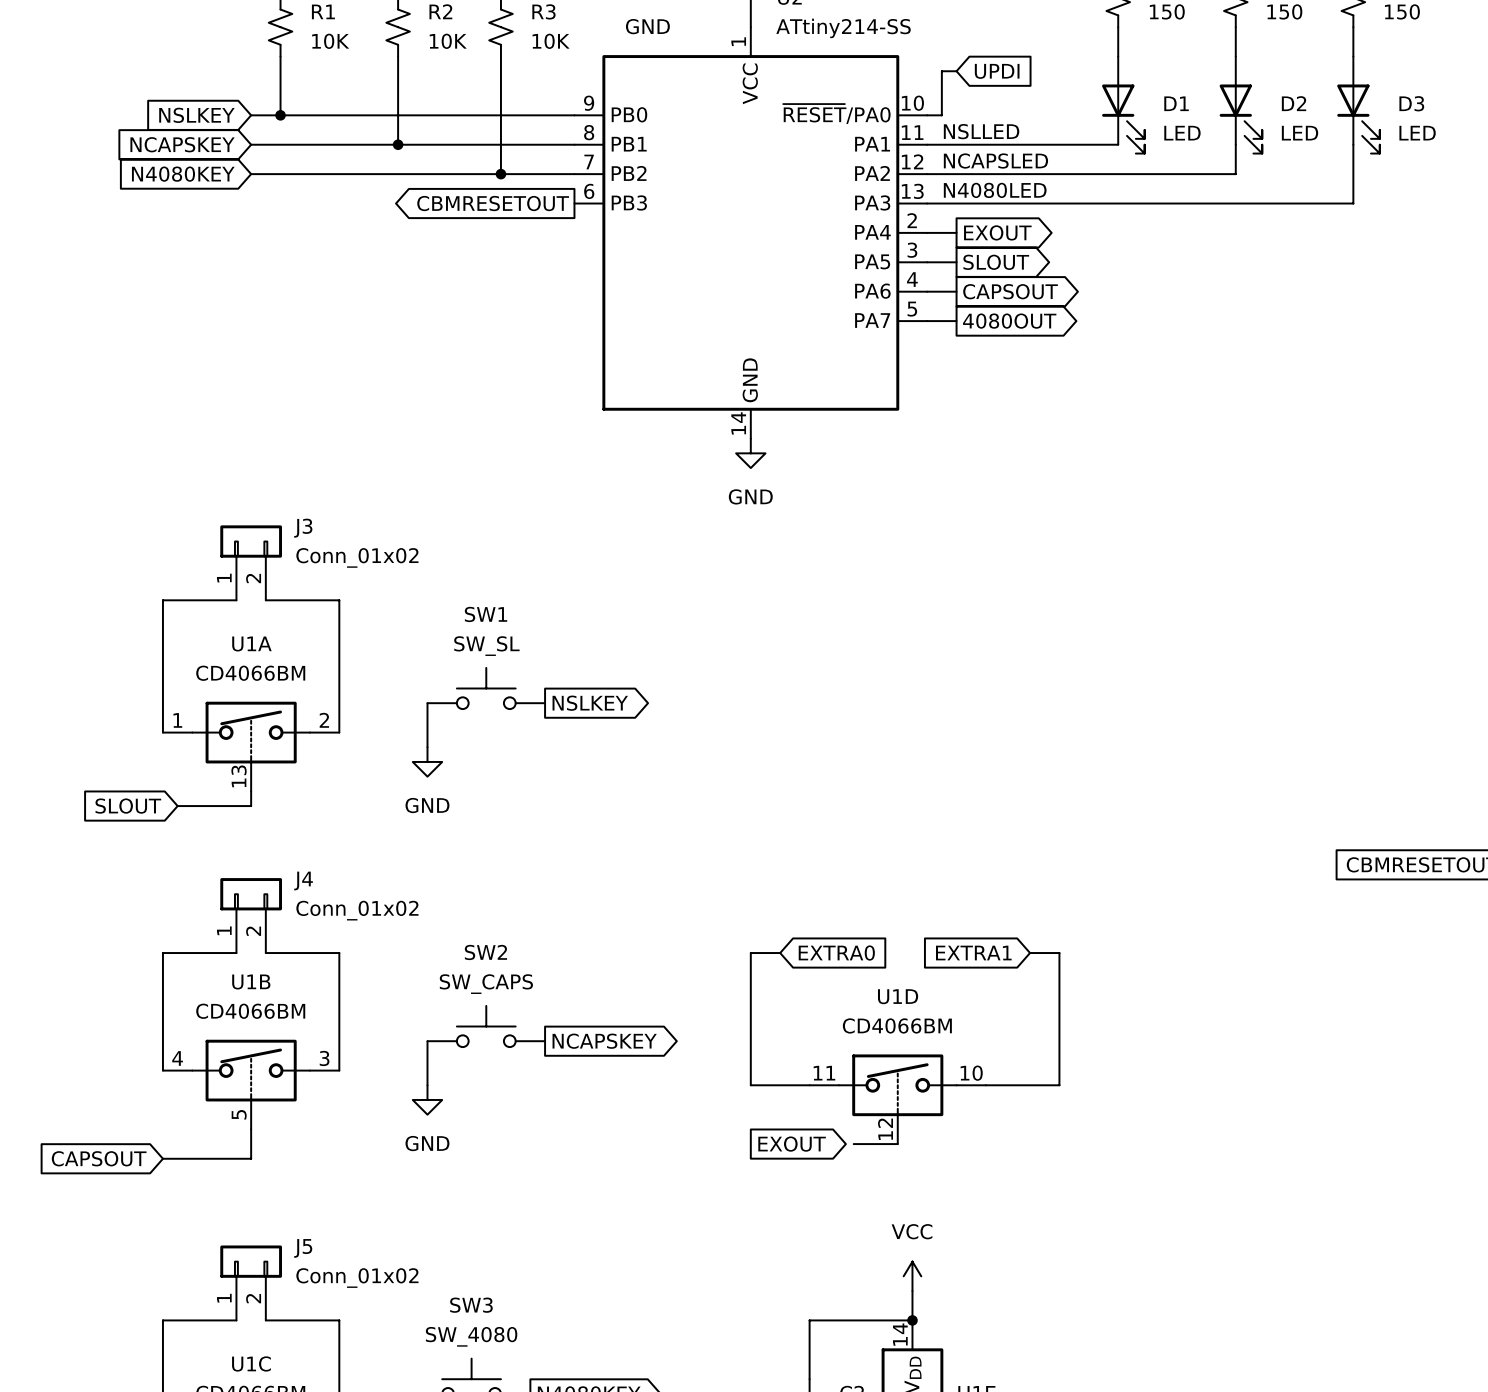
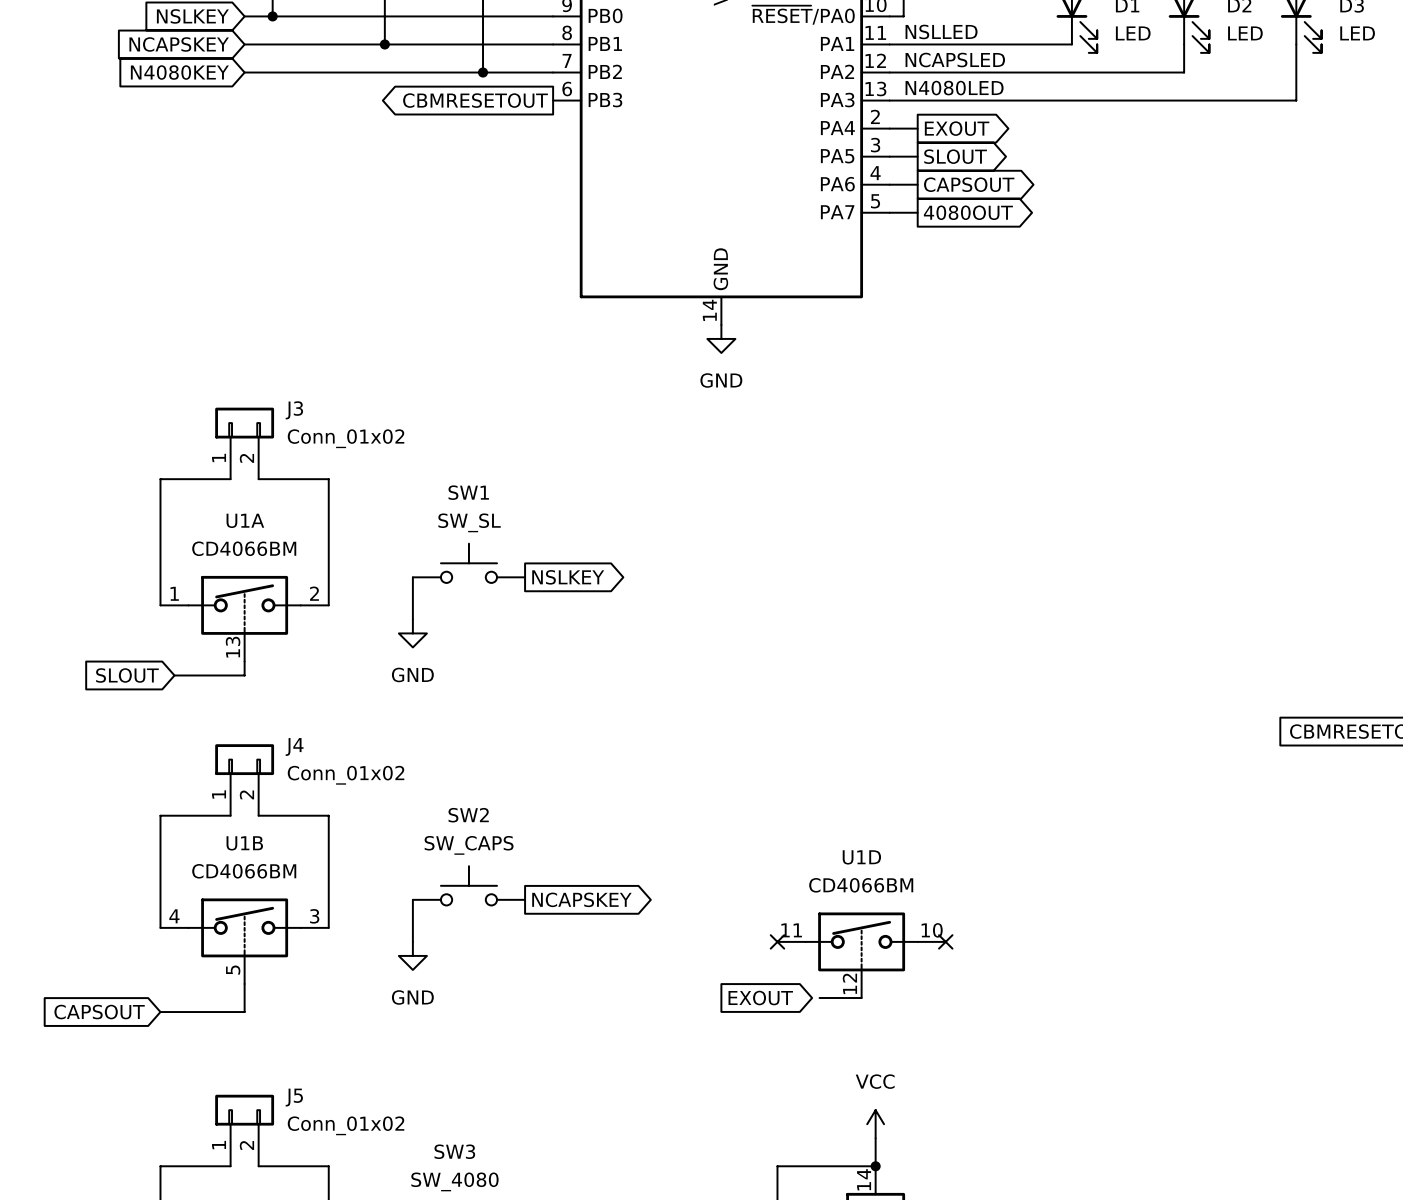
wire: (780, 953) (750, 953) (750, 1085) (809, 1085) -> none
global label: EXTRA0 (836, 953) -> none
global label: EXTRA1 (973, 953) -> none
wire: (1030, 953) (1059, 953) (1059, 1085) (985, 1085) -> none
no-connect mark: none -> (777, 941)
no-connect mark: none -> (945, 941)

